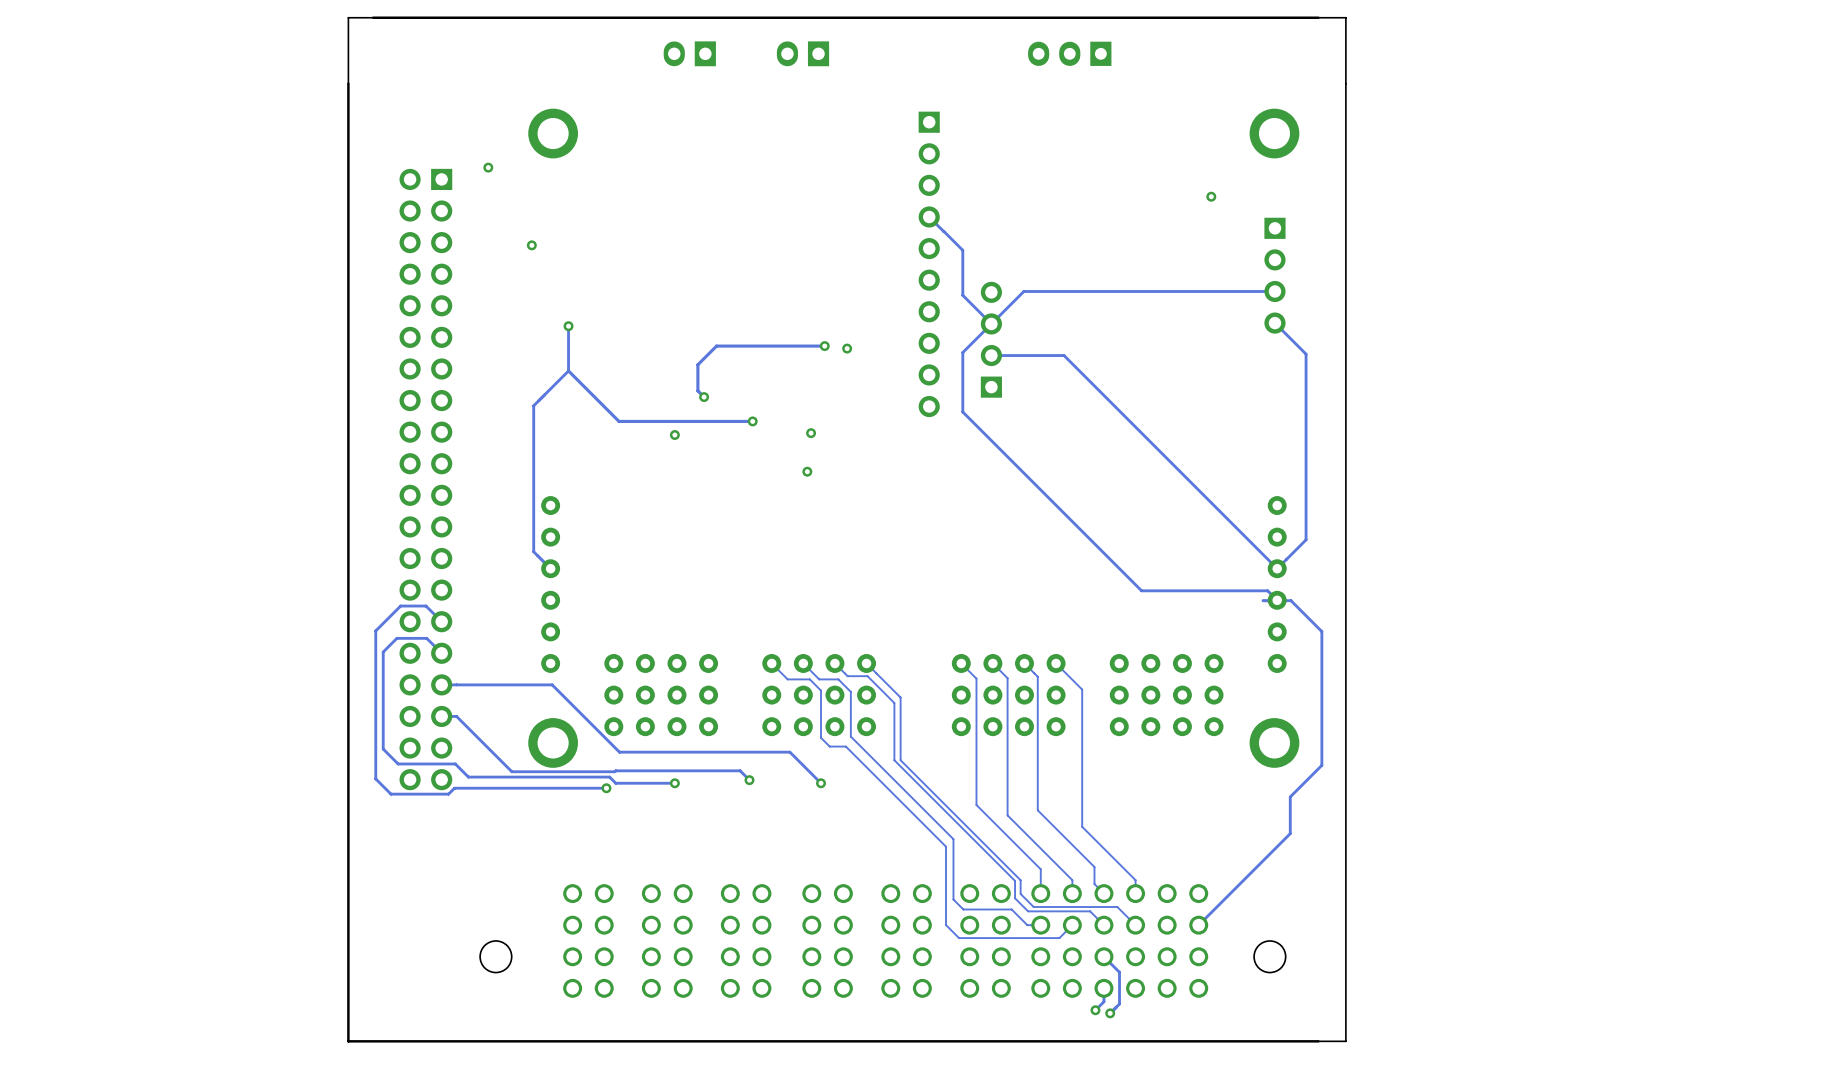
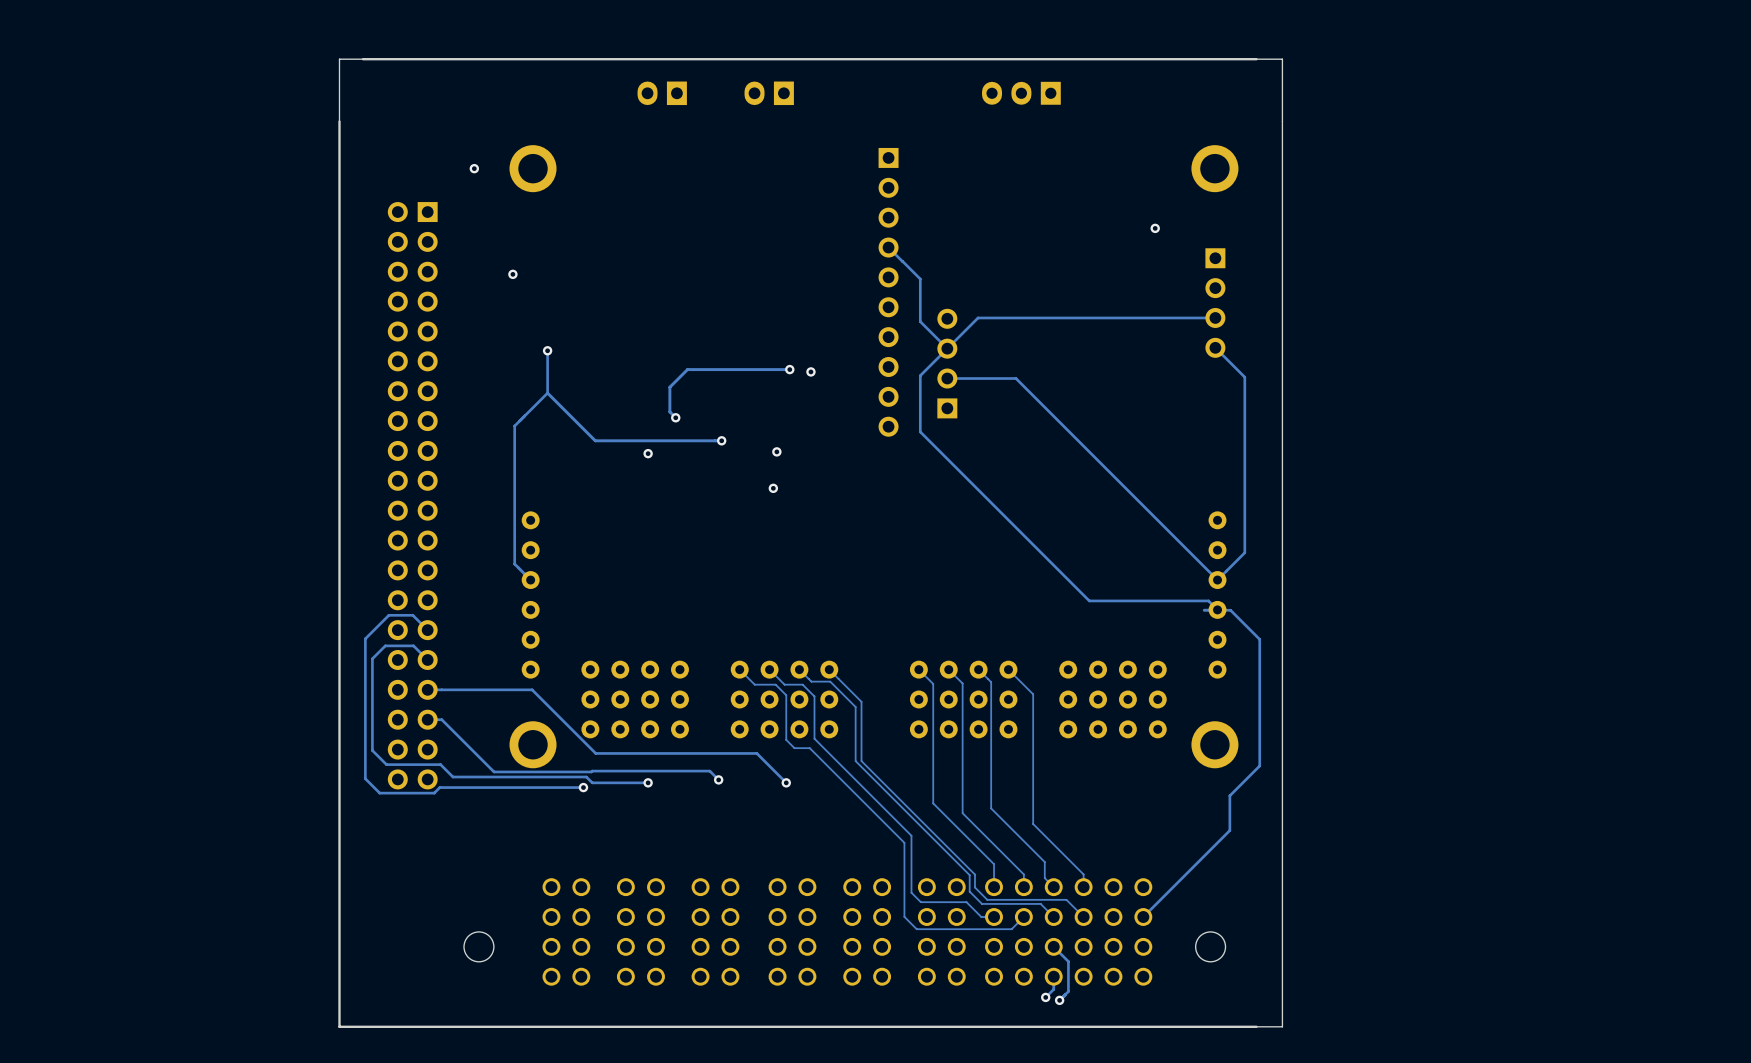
via position: (488, 167) -> (474, 168)

